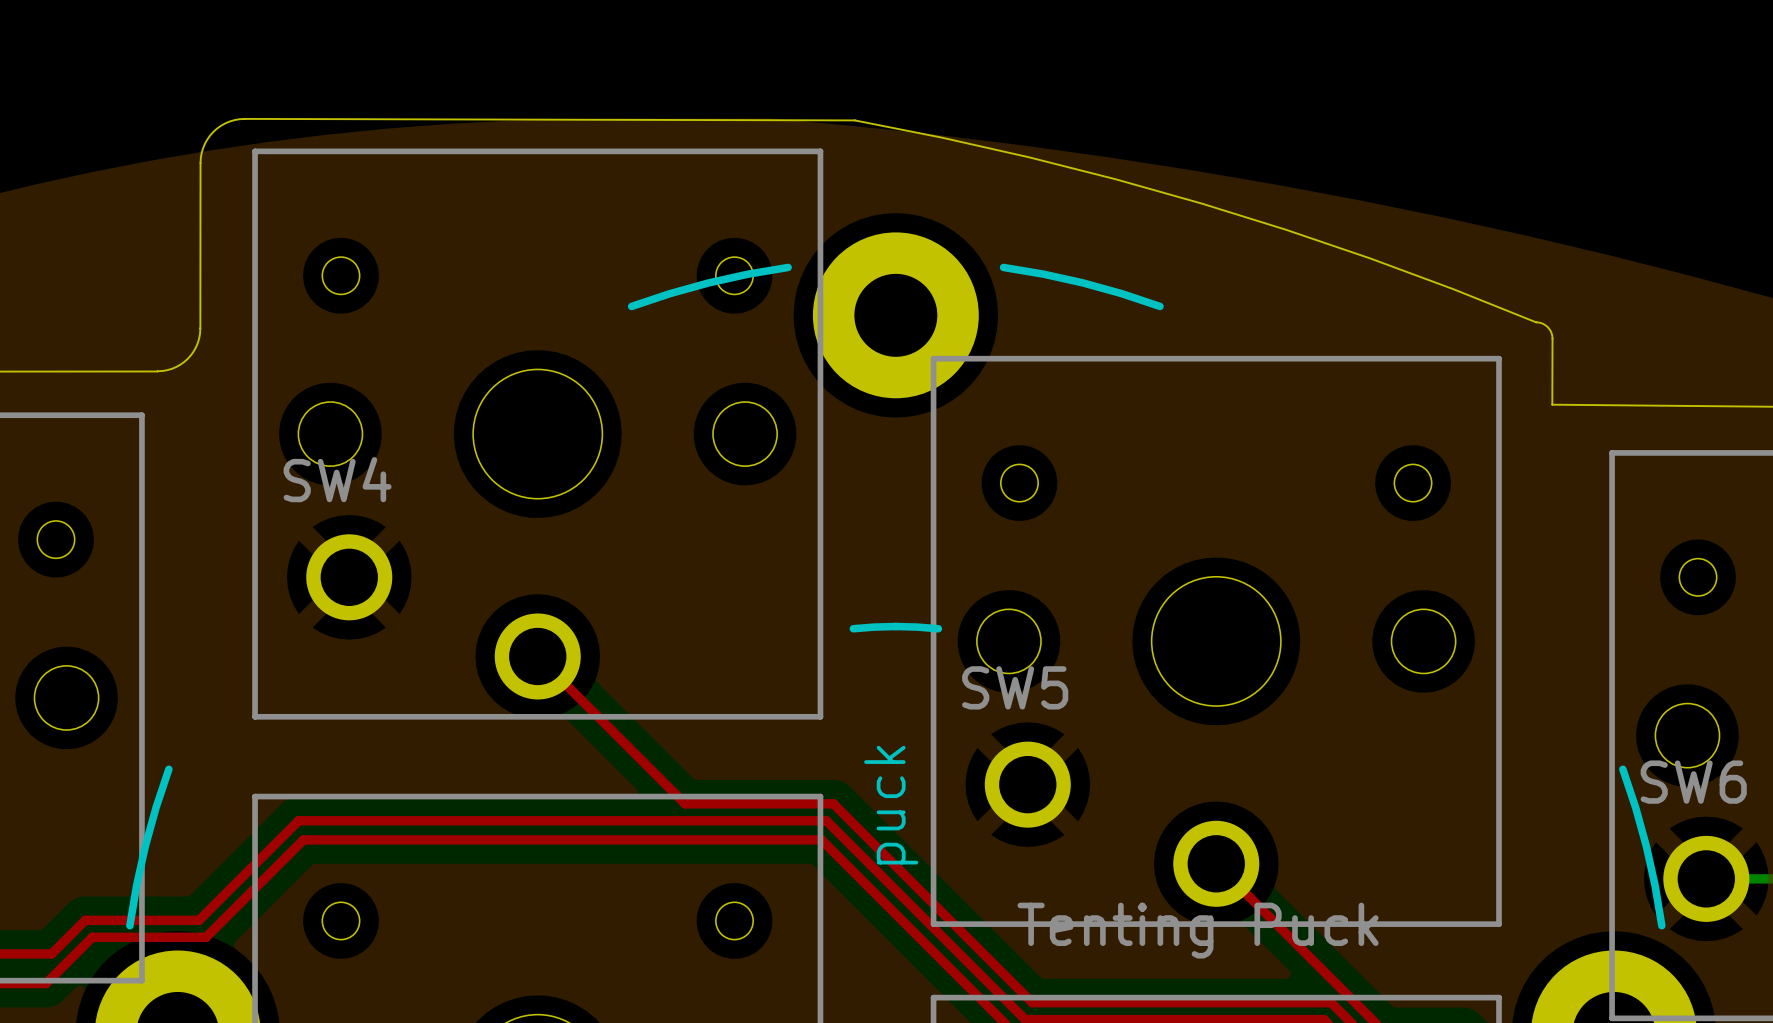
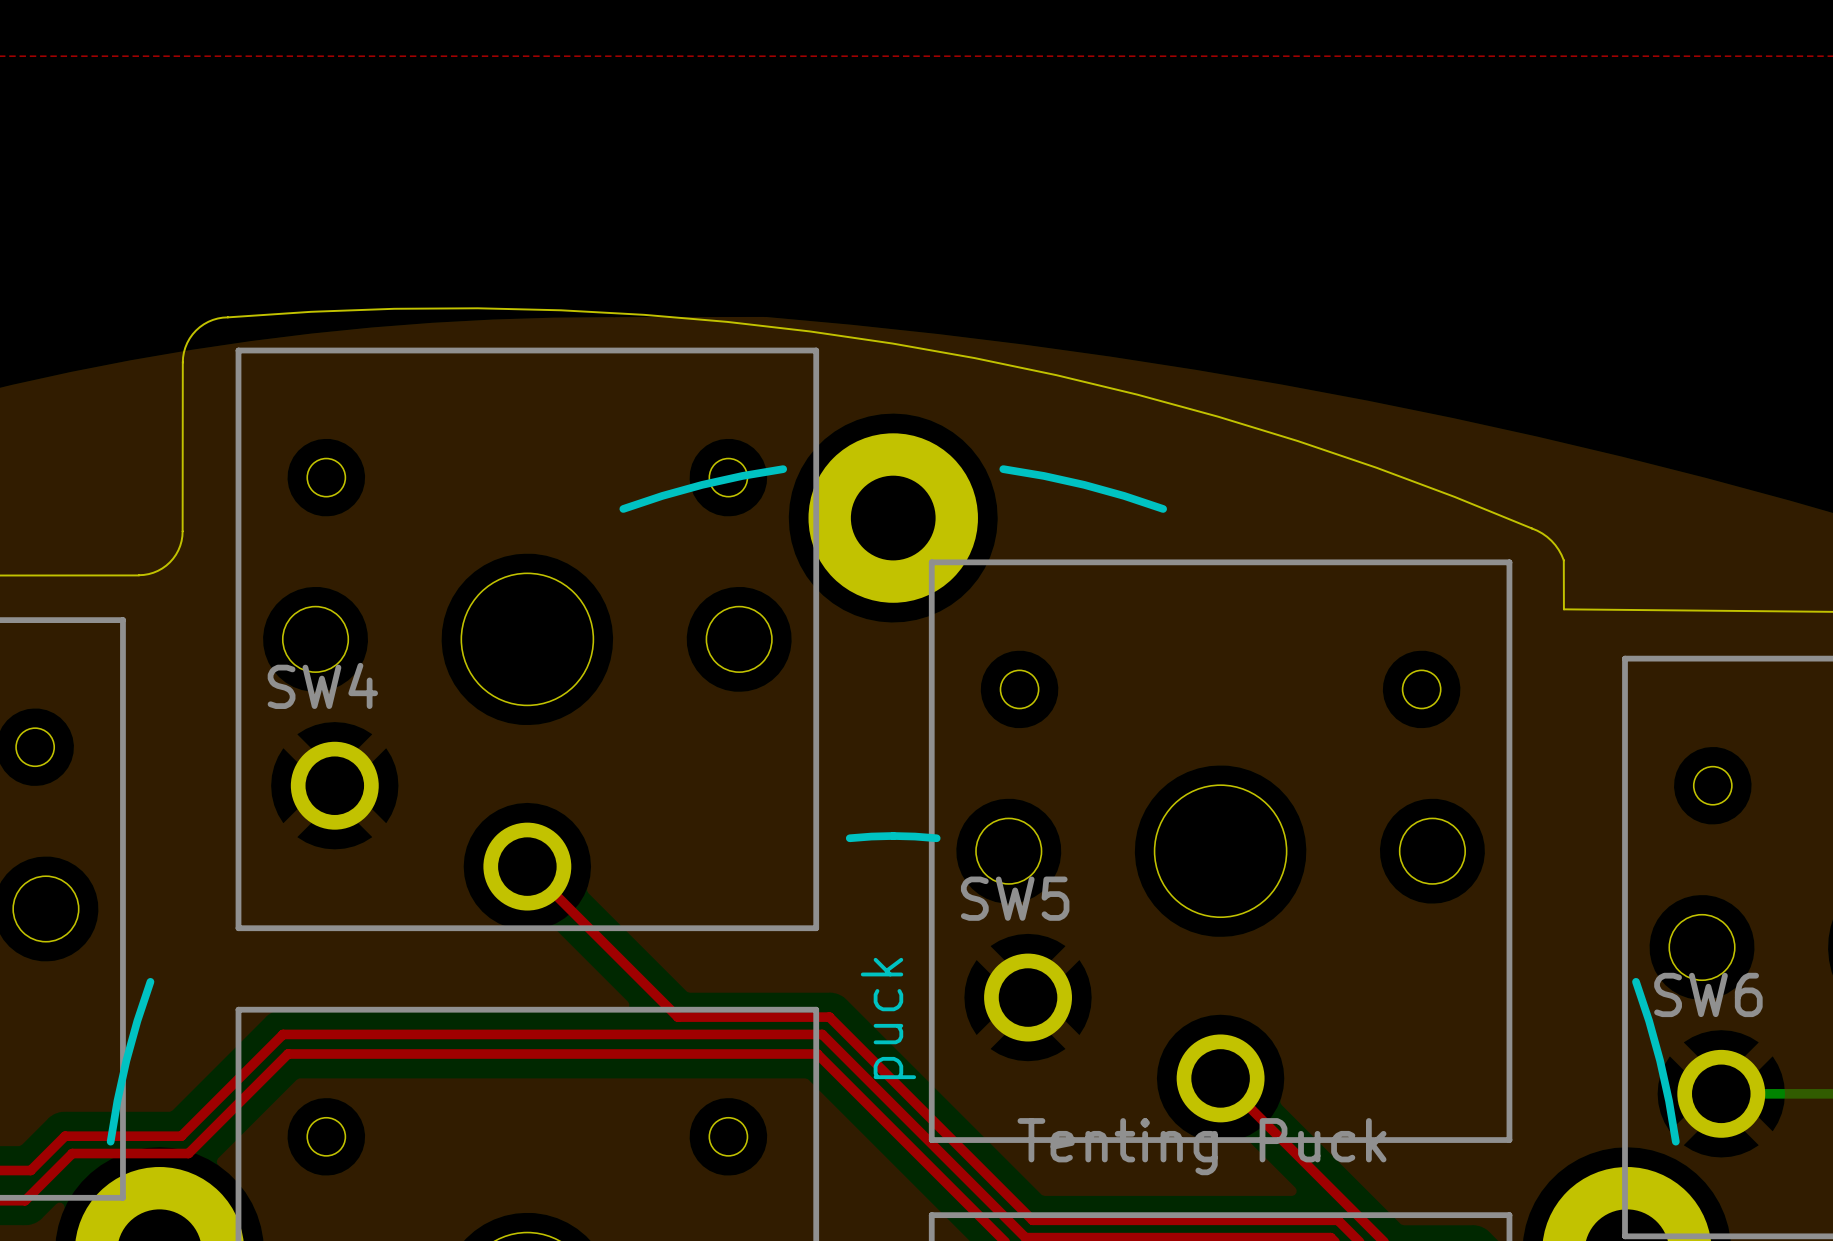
board edge: (244, 118) (854, 120) (942, 137) (1028, 157) (1200, 203) (1370, 258) (1542, 323) (1549, 328) (1552, 336) (1552, 404) -> (227, 317) (394, 308) (477, 308) (644, 314) (810, 331) (892, 343) (1056, 375) (1137, 394) (1297, 441) (1454, 496) (1537, 530) (1555, 545) (1563, 560) (1563, 609)

